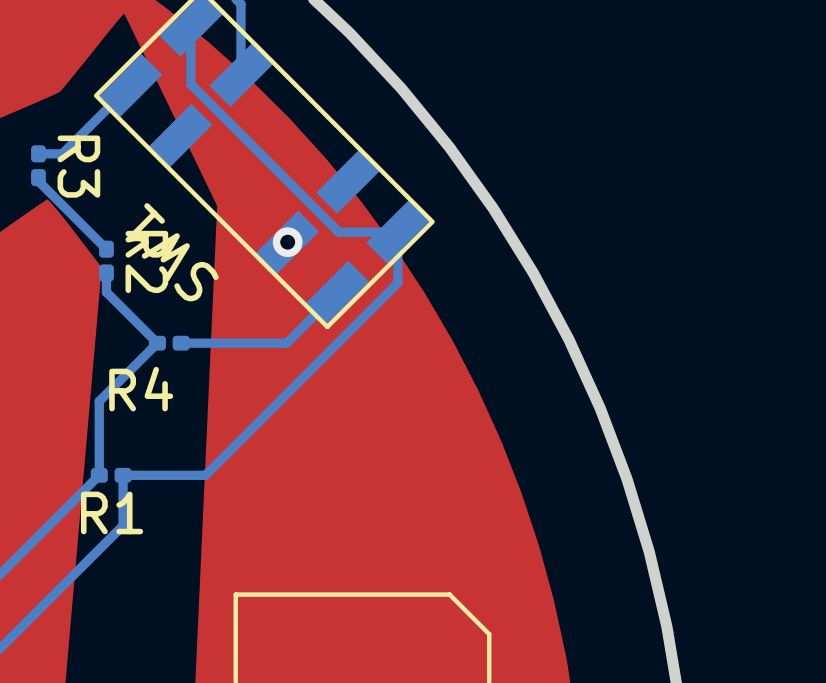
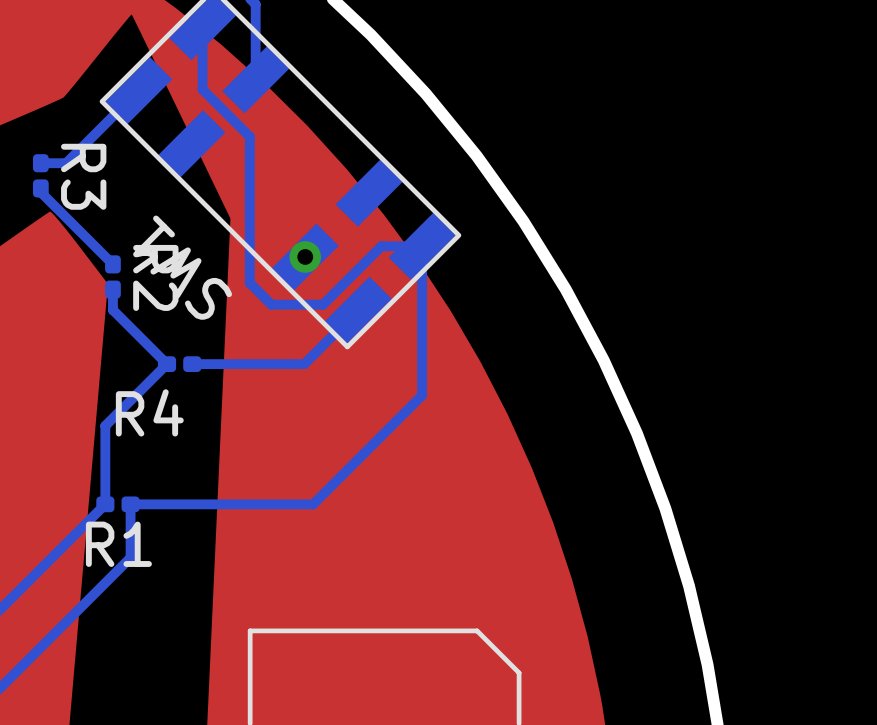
bottom track: (235, 128) (338, 232) (359, 232) -> (249, 136) (249, 283) (271, 304) (323, 304) (381, 246)
bottom track: (397, 282) (205, 475) -> (422, 300) (422, 395) (313, 504) (217, 504)

